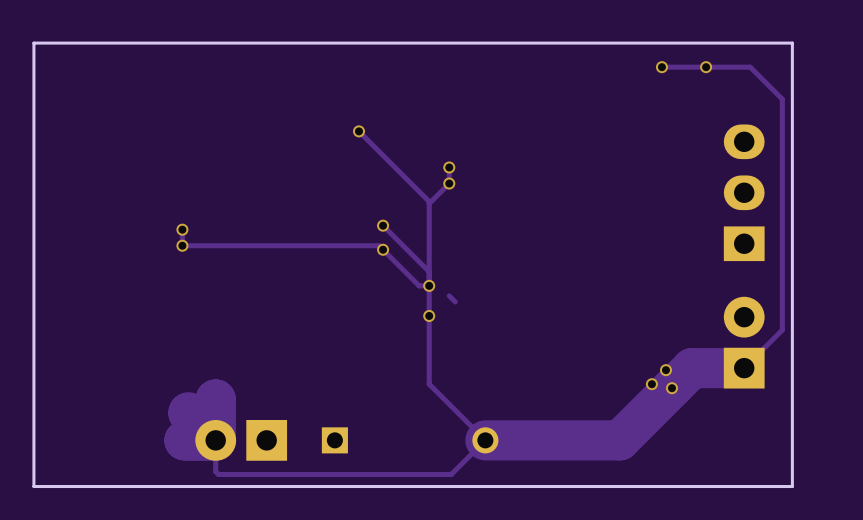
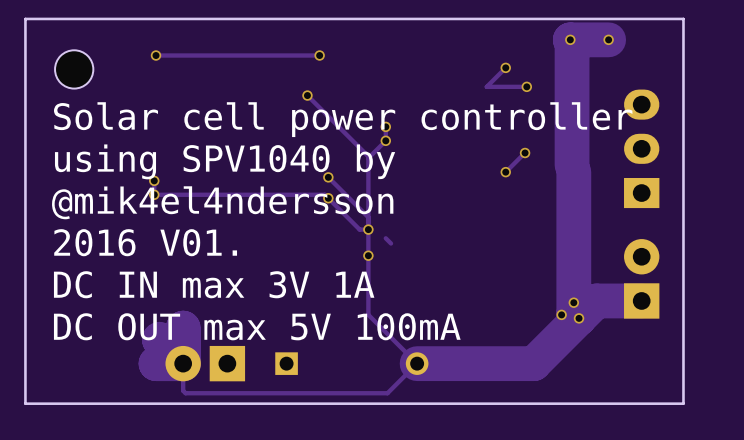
track: (706, 67) (750, 67) (782, 99) (782, 330) (744, 368) -> (608, 39) (570, 39) (572, 41) (572, 165)
via: none -> (156, 55)
track: none -> (319, 55) (156, 55)
via: none -> (319, 55)
track: none -> (505, 67) (486, 86) (526, 86)
via: none -> (505, 67)
part: none -> (74, 69)
via: none -> (526, 86)
text: none -> Solar cell power controller (343, 119)
track: none -> (524, 152) (505, 172)
via: none -> (525, 152)
text: none -> using SPV1040 by (225, 161)
via: none -> (505, 172)
track: none -> (573, 172) (573, 313) (579, 318)
text: none -> @mik4el4ndersson (222, 202)
text: none -> 2016 V01. (145, 242)
text: none -> DC IN max 3V 1A (214, 284)
text: none -> DC OUT max 5V 100mA (257, 326)

